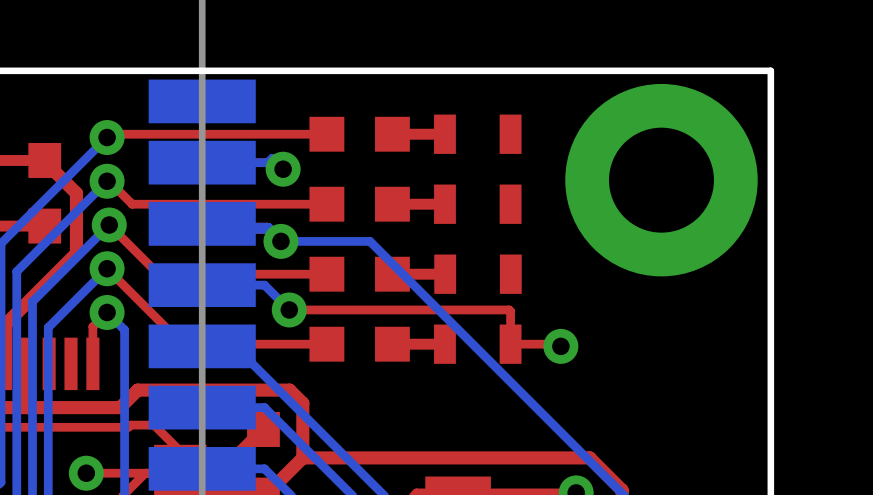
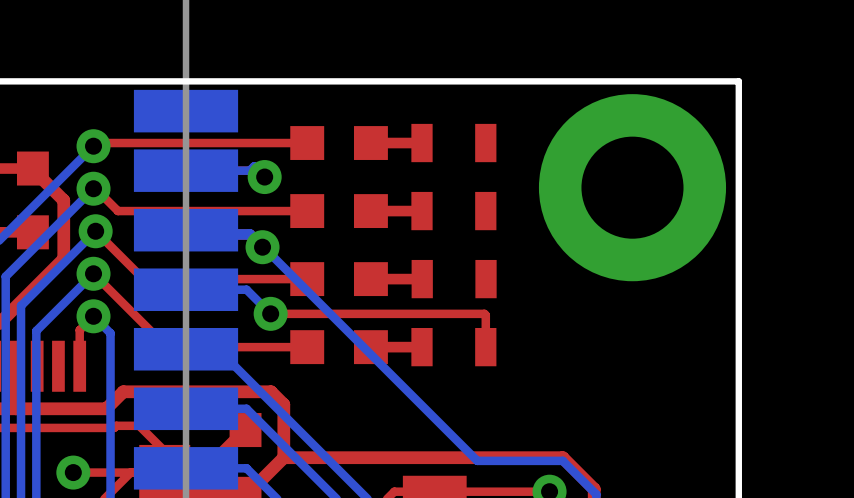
bottom track: (282, 241) (370, 241) (589, 461) -> (263, 247) (477, 460) (562, 460)
top track: (510, 344) (558, 344) (560, 346) -> none
via: (560, 346) -> none

